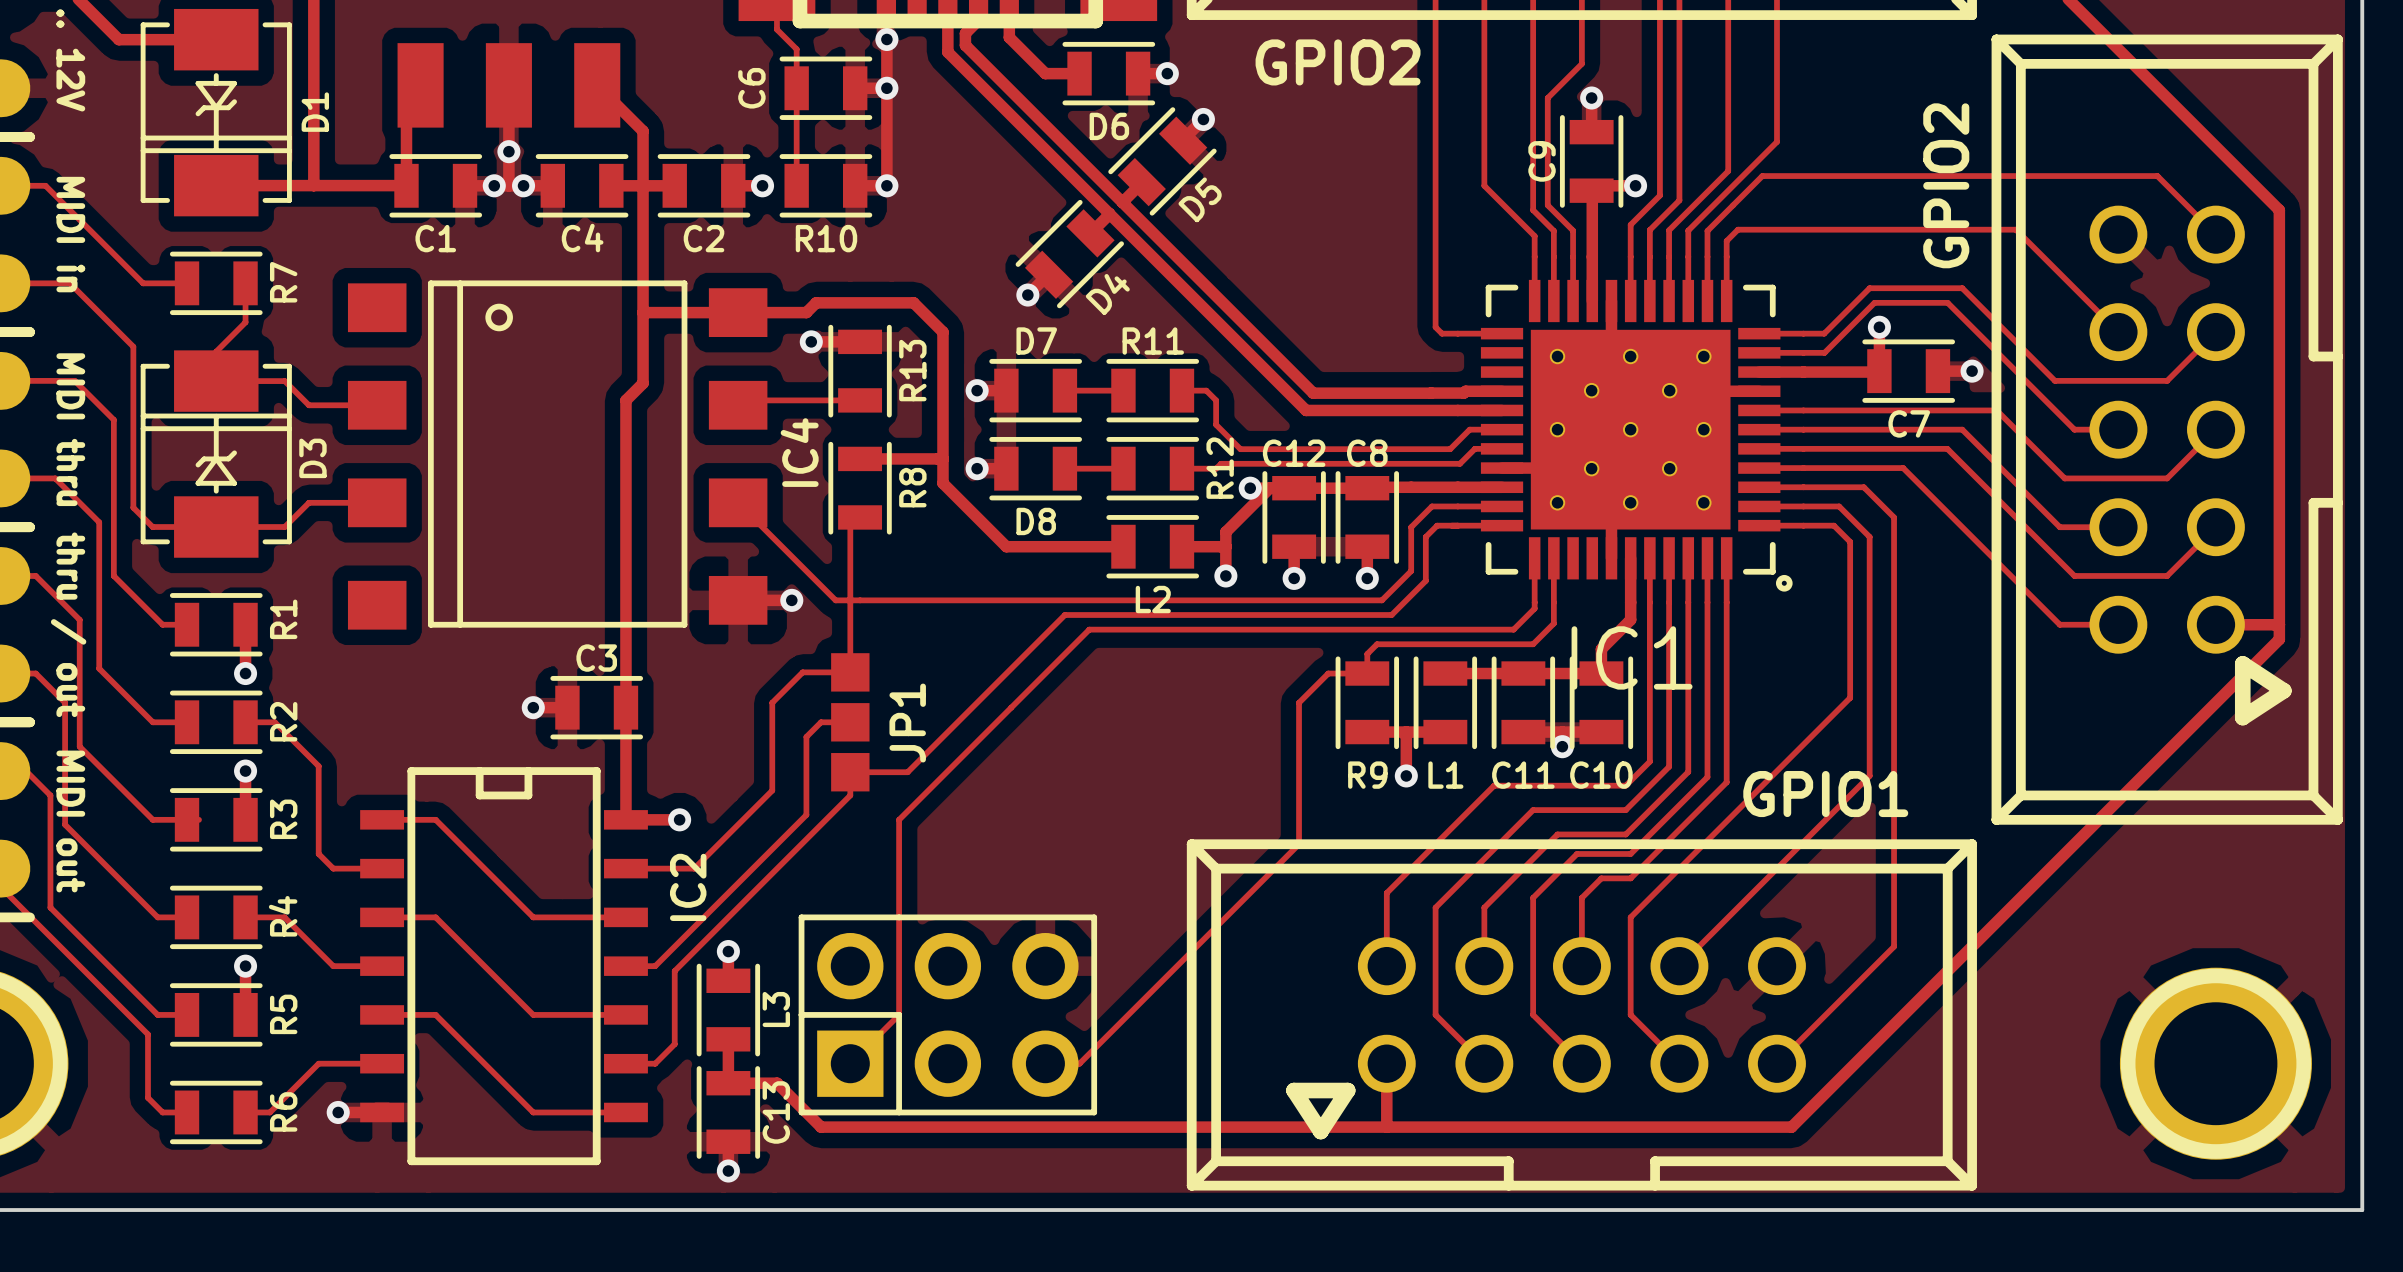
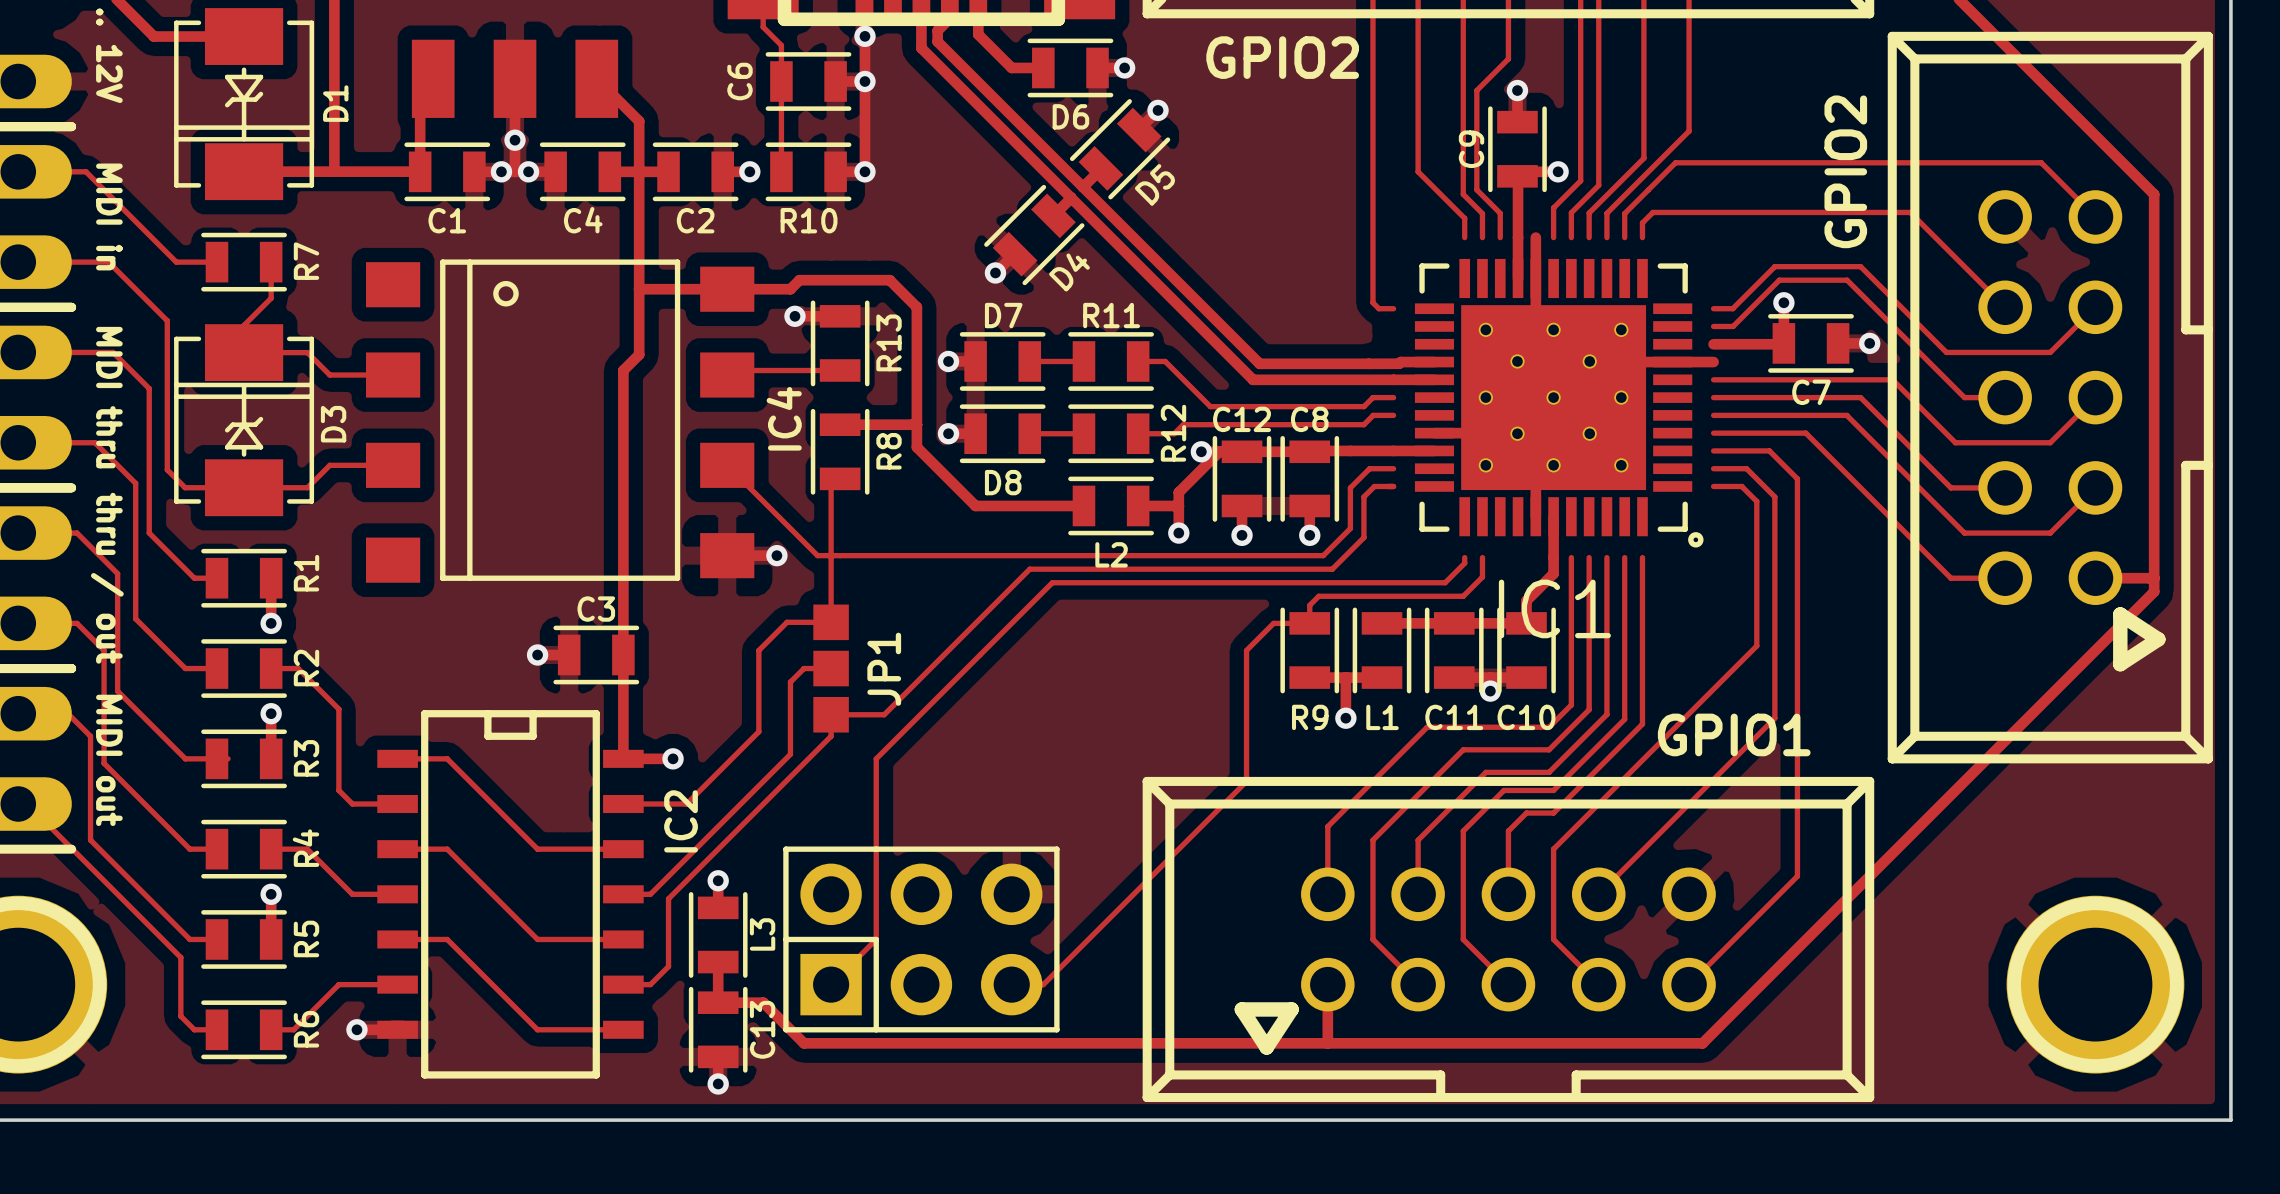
track: (1534, 256) (1534, 301) -> none
track: (1553, 256) (1553, 301) -> none
track: (1573, 256) (1573, 301) -> none
track: (1630, 256) (1630, 301) -> (1535, 237) (1535, 278)
track: (1649, 256) (1649, 301) -> none
track: (1669, 256) (1669, 301) -> none
track: (1688, 256) (1688, 301) -> none
track: (1707, 256) (1707, 301) -> none
track: (1726, 256) (1726, 301) -> none
track: (1457, 333) (1502, 333) -> none
track: (1759, 333) (1803, 333) -> none
track: (1759, 352) (1803, 352) -> none
track: (1759, 372) (1803, 372) -> (1672, 362) (1713, 362)
track: (1206, 390) (1216, 400) (1216, 424) (1240, 449) (1450, 449) (1469, 429) (1502, 429) -> (1160, 361) (1165, 361) (1210, 406) (1363, 406) (1372, 397) (1393, 397)
track: (1759, 410) (1803, 410) -> none
track: (1759, 429) (1803, 429) -> none
track: (1502, 448) (1474, 448) (1459, 463) (1220, 463) (1216, 468) -> (1393, 415) (1373, 415) (1363, 424) (1183, 424) (1174, 433) (1169, 433)
track: (1759, 448) (1803, 448) -> none
track: (1759, 468) (1803, 468) -> none
track: (1759, 487) (1803, 487) -> none
track: (1457, 506) (1502, 506) -> none
track: (1759, 506) (1803, 506) -> none
track: (1457, 525) (1502, 525) -> none
track: (1759, 525) (1803, 525) -> none
track: (1534, 558) (1534, 602) -> none
track: (1553, 558) (1553, 602) -> none
track: (1649, 558) (1649, 602) -> none
track: (1669, 558) (1669, 602) -> none
track: (1688, 558) (1688, 602) -> none
track: (1707, 558) (1707, 602) -> none
track: (1726, 558) (1726, 602) -> none

